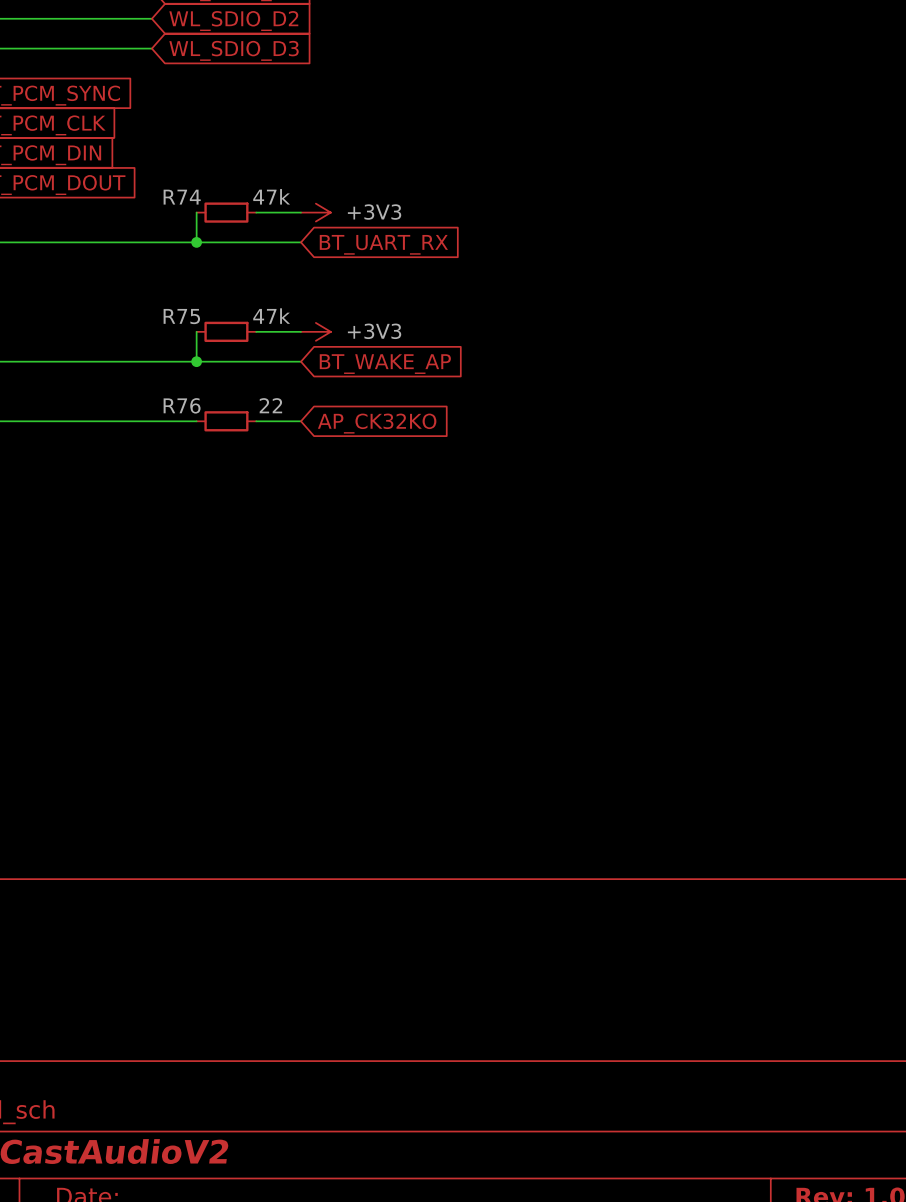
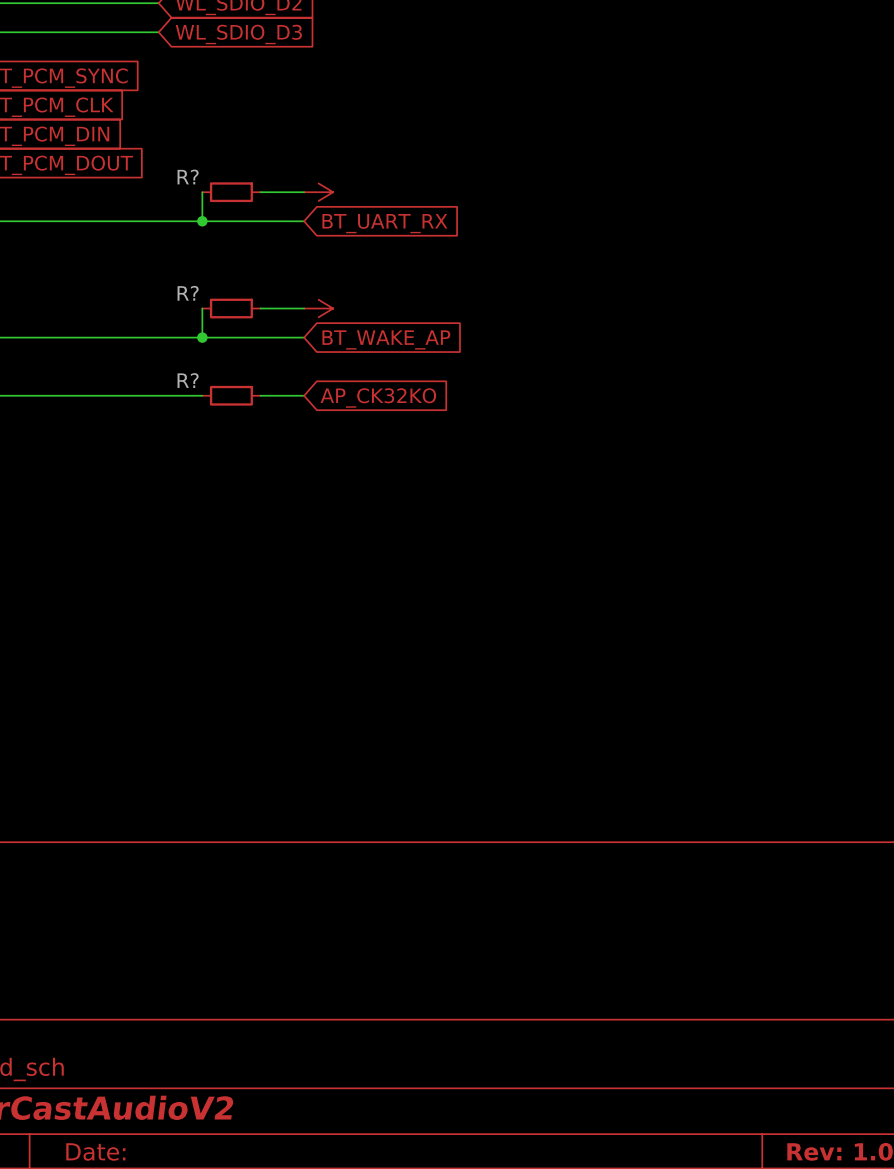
R74 value: 47k (271, 196) -> none
R74 name: R74 (182, 197) -> R? (188, 176)
power symbol text: +3V3 (374, 212) -> none
R75 name: R75 (181, 316) -> R? (188, 293)
R75 value: 47k (271, 316) -> none
power symbol text: +3V3 (374, 331) -> none
R76 name: R76 (182, 405) -> R? (188, 380)
R76 value: 22 (270, 405) -> none

